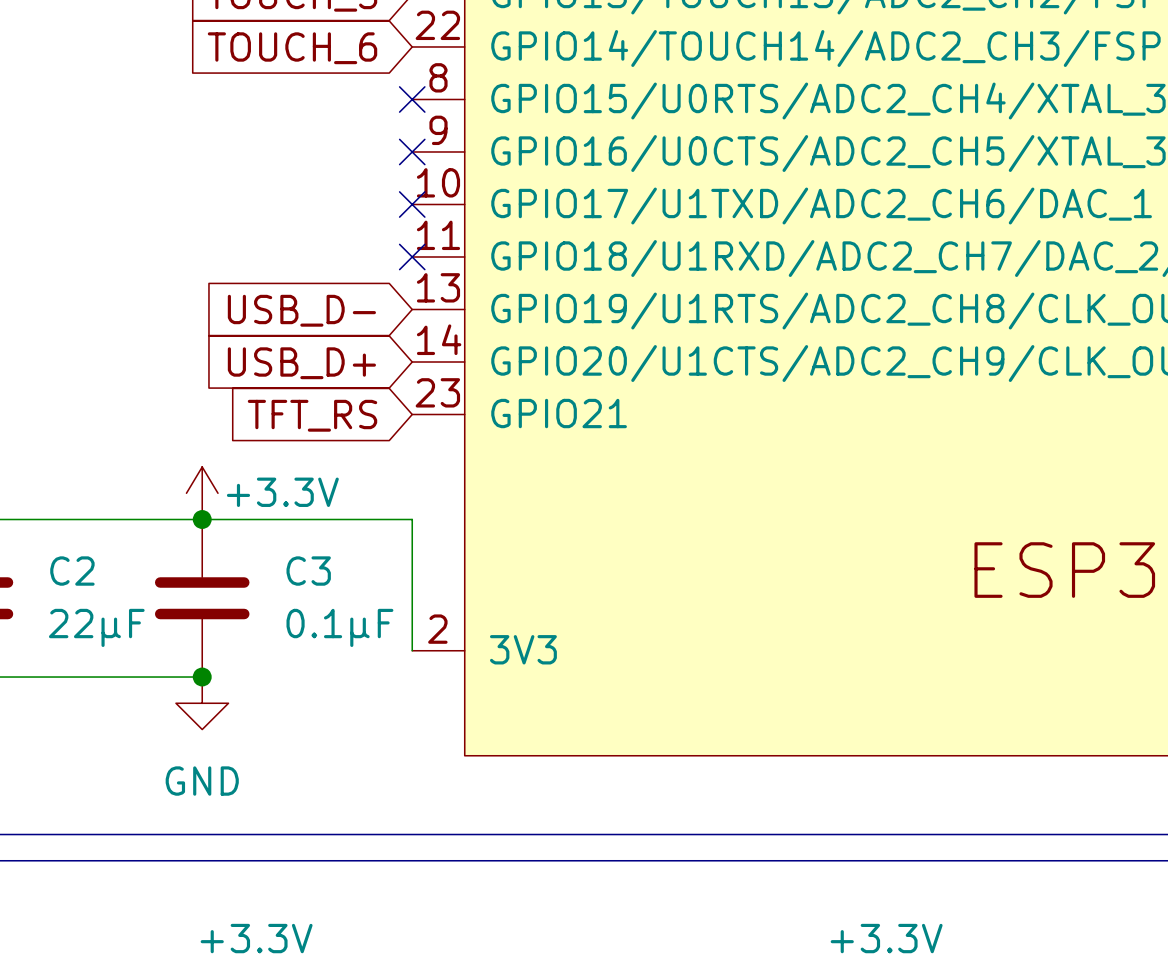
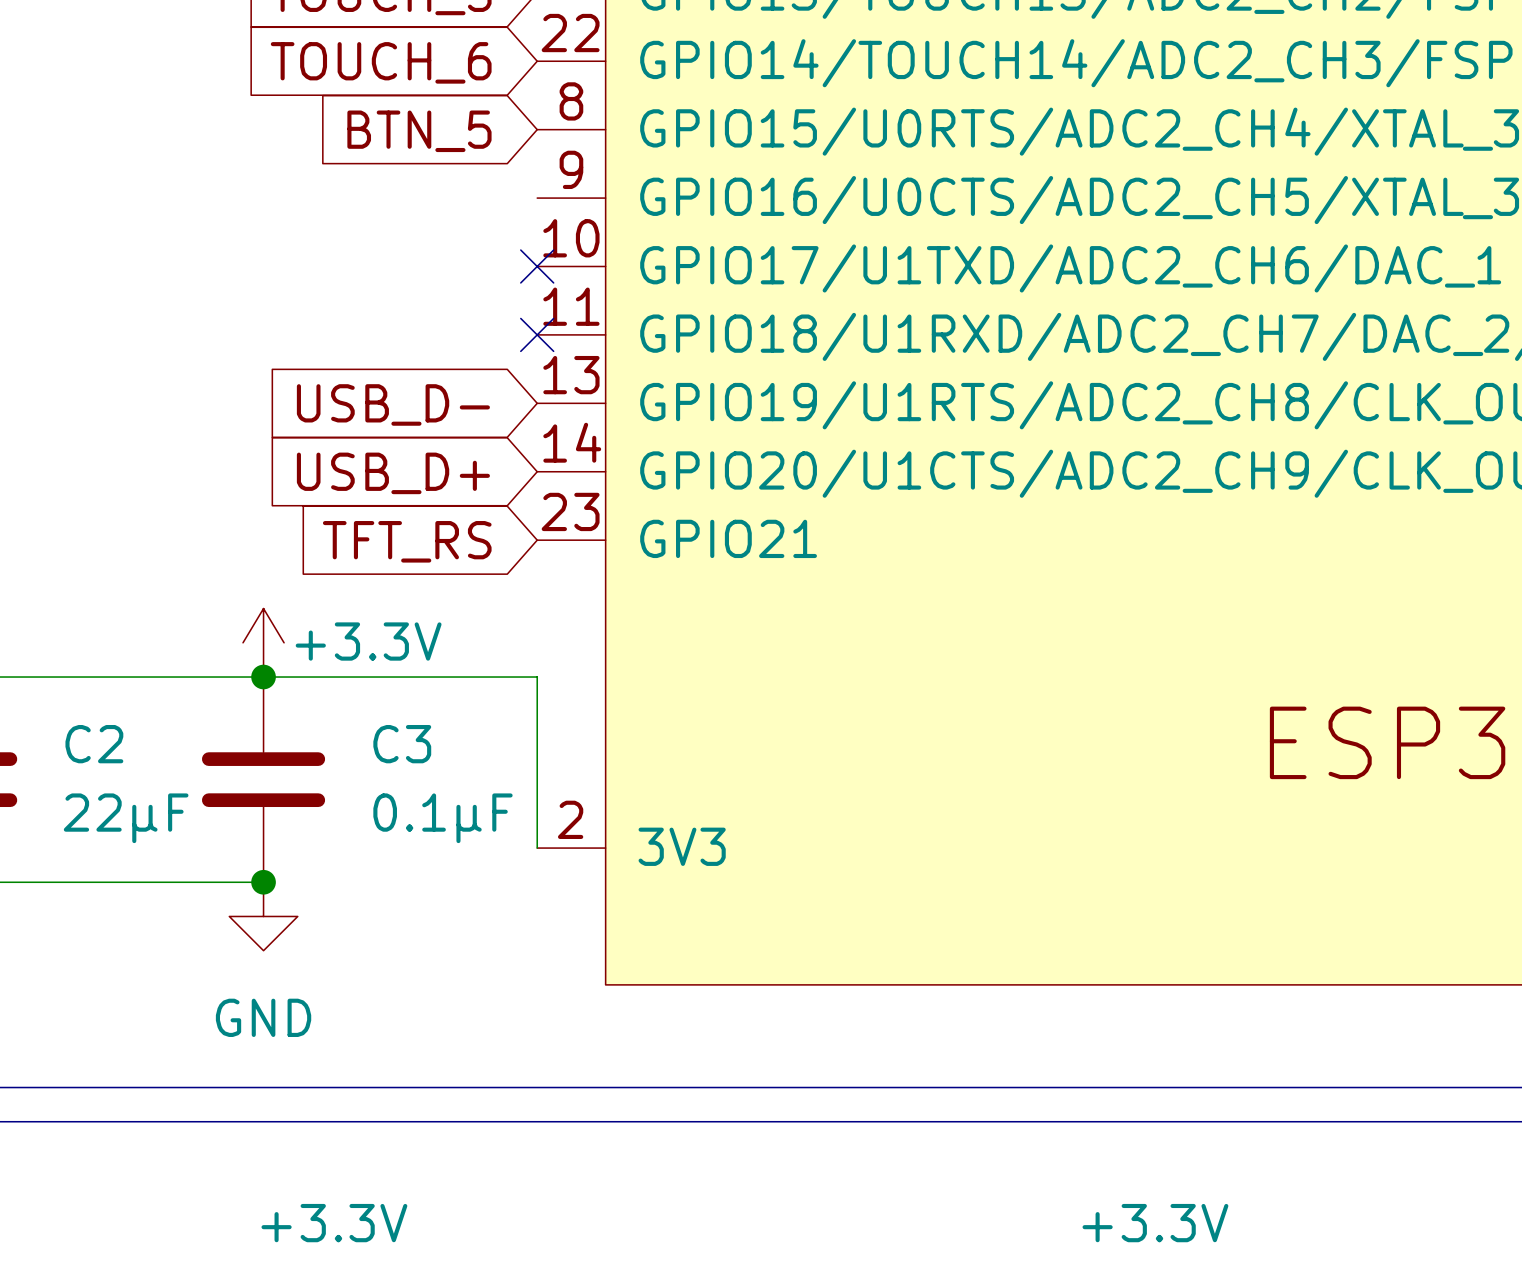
no-connect mark: (412, 99) -> none
global label: none -> BTN_5 (419, 131)
no-connect mark: (412, 151) -> none

